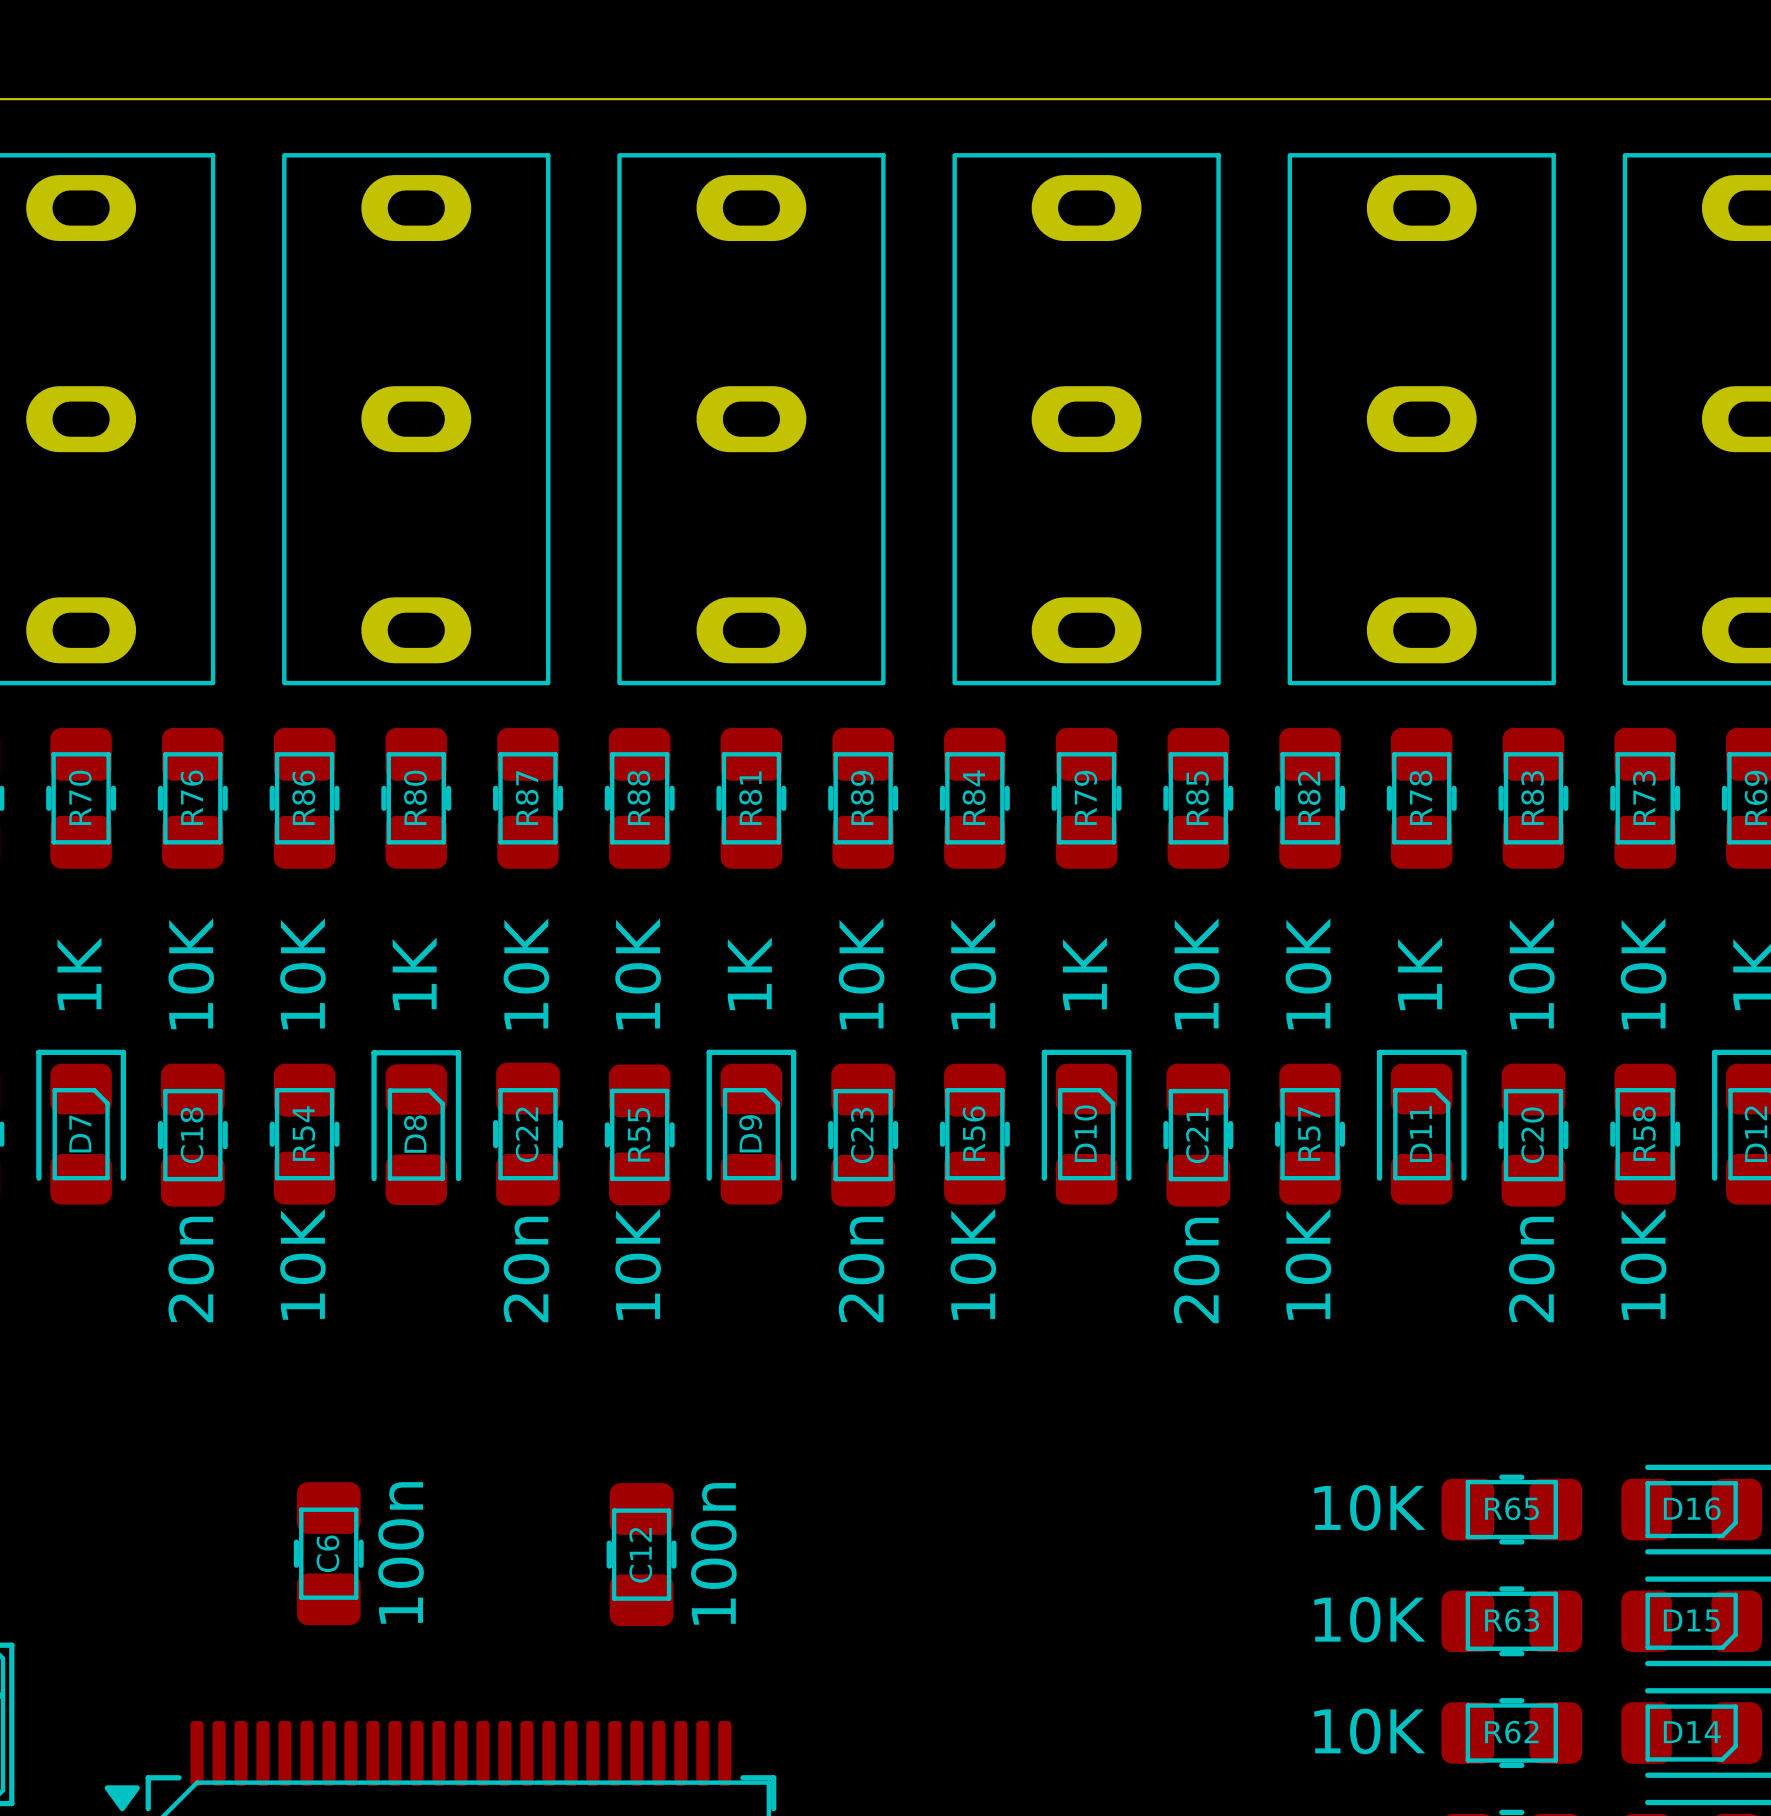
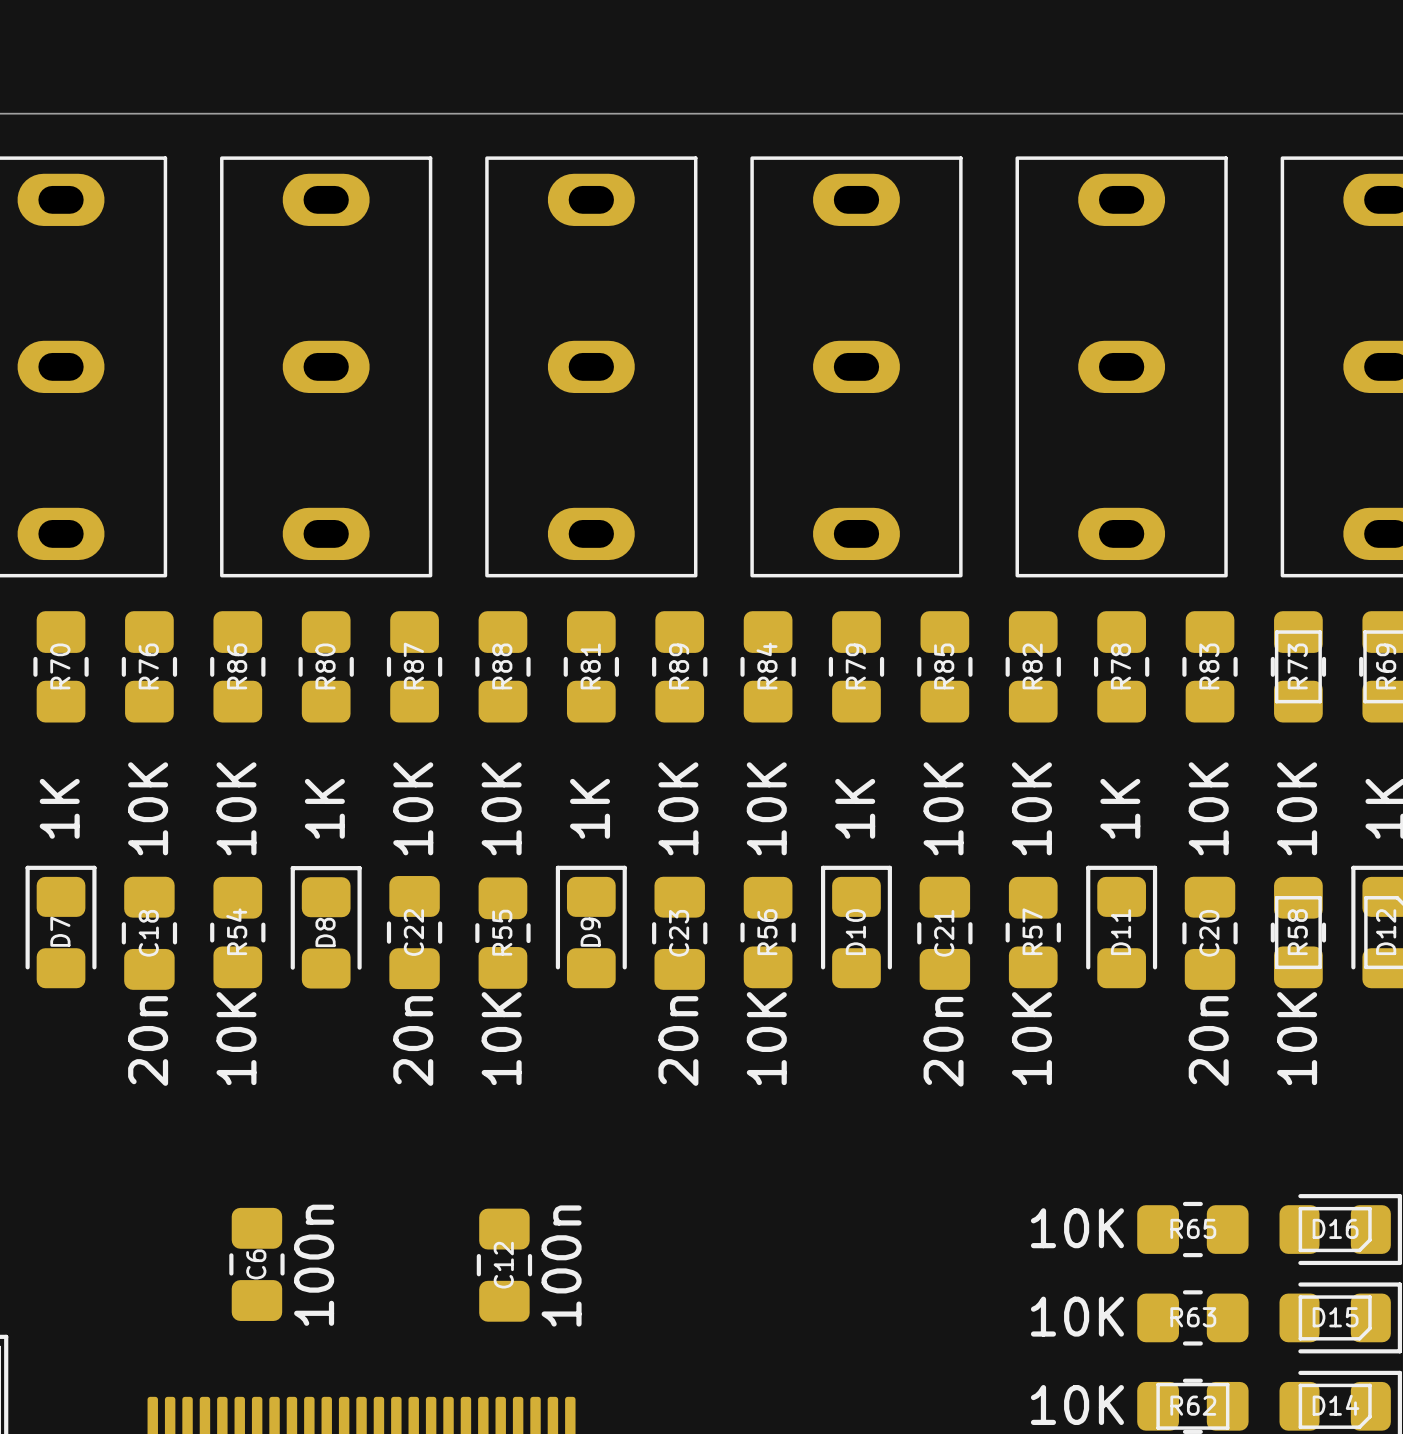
R70 footprint: [46, 727, 117, 869] -> [33, 611, 89, 723]
R76 footprint: [157, 727, 228, 869] -> [121, 611, 178, 723]
R86 footprint: [269, 727, 340, 869] -> [210, 611, 266, 723]
R80 footprint: [381, 727, 452, 869] -> [298, 611, 354, 723]
R87 footprint: [493, 727, 563, 869] -> [386, 611, 443, 723]
R88 footprint: [604, 727, 675, 869] -> [475, 611, 531, 723]
R81 footprint: [716, 727, 787, 869] -> [563, 611, 619, 723]
R89 footprint: [828, 727, 899, 869] -> [652, 611, 708, 723]
R84 footprint: [939, 727, 1010, 869] -> [740, 611, 796, 723]
R79 footprint: [1051, 727, 1122, 869] -> [828, 611, 885, 723]
R85 footprint: [1163, 727, 1234, 869] -> [917, 611, 973, 723]
R82 footprint: [1275, 727, 1345, 869] -> [1005, 611, 1061, 723]
R78 footprint: [1386, 727, 1457, 869] -> [1093, 611, 1150, 723]
R83 footprint: [1498, 727, 1569, 869] -> [1182, 611, 1238, 723]
D7 footprint: [36, 1049, 126, 1205] -> [25, 865, 97, 989]
D9 footprint: [706, 1049, 797, 1205] -> [555, 865, 627, 989]
D10 footprint: [1041, 1049, 1132, 1205] -> [820, 865, 892, 989]
D11 footprint: [1376, 1049, 1467, 1205] -> [1086, 865, 1158, 989]
D8 footprint: [371, 1050, 462, 1205] -> [290, 866, 362, 989]
C22 footprint: [493, 1062, 563, 1206] -> [386, 876, 443, 990]
C18 footprint: [157, 1063, 228, 1207] -> [121, 876, 178, 990]
R54 footprint: [269, 1063, 340, 1205] -> [210, 876, 266, 989]
C23 footprint: [828, 1063, 899, 1207] -> [652, 876, 708, 990]
R56 footprint: [939, 1063, 1010, 1205] -> [740, 876, 796, 989]
C21 footprint: [1163, 1063, 1234, 1207] -> [917, 876, 973, 990]
R57 footprint: [1275, 1063, 1345, 1205] -> [1005, 876, 1061, 989]
C20 footprint: [1498, 1063, 1569, 1207] -> [1182, 876, 1238, 990]
R55 footprint: [604, 1064, 675, 1206] -> [475, 877, 531, 989]
R65 footprint: [1441, 1474, 1583, 1545] -> [1137, 1201, 1249, 1258]
C6 footprint: [293, 1482, 364, 1626] -> [229, 1207, 285, 1321]
C12 footprint: [606, 1483, 677, 1627] -> [476, 1208, 533, 1322]
R63 footprint: [1441, 1586, 1583, 1657] -> [1137, 1290, 1249, 1346]

